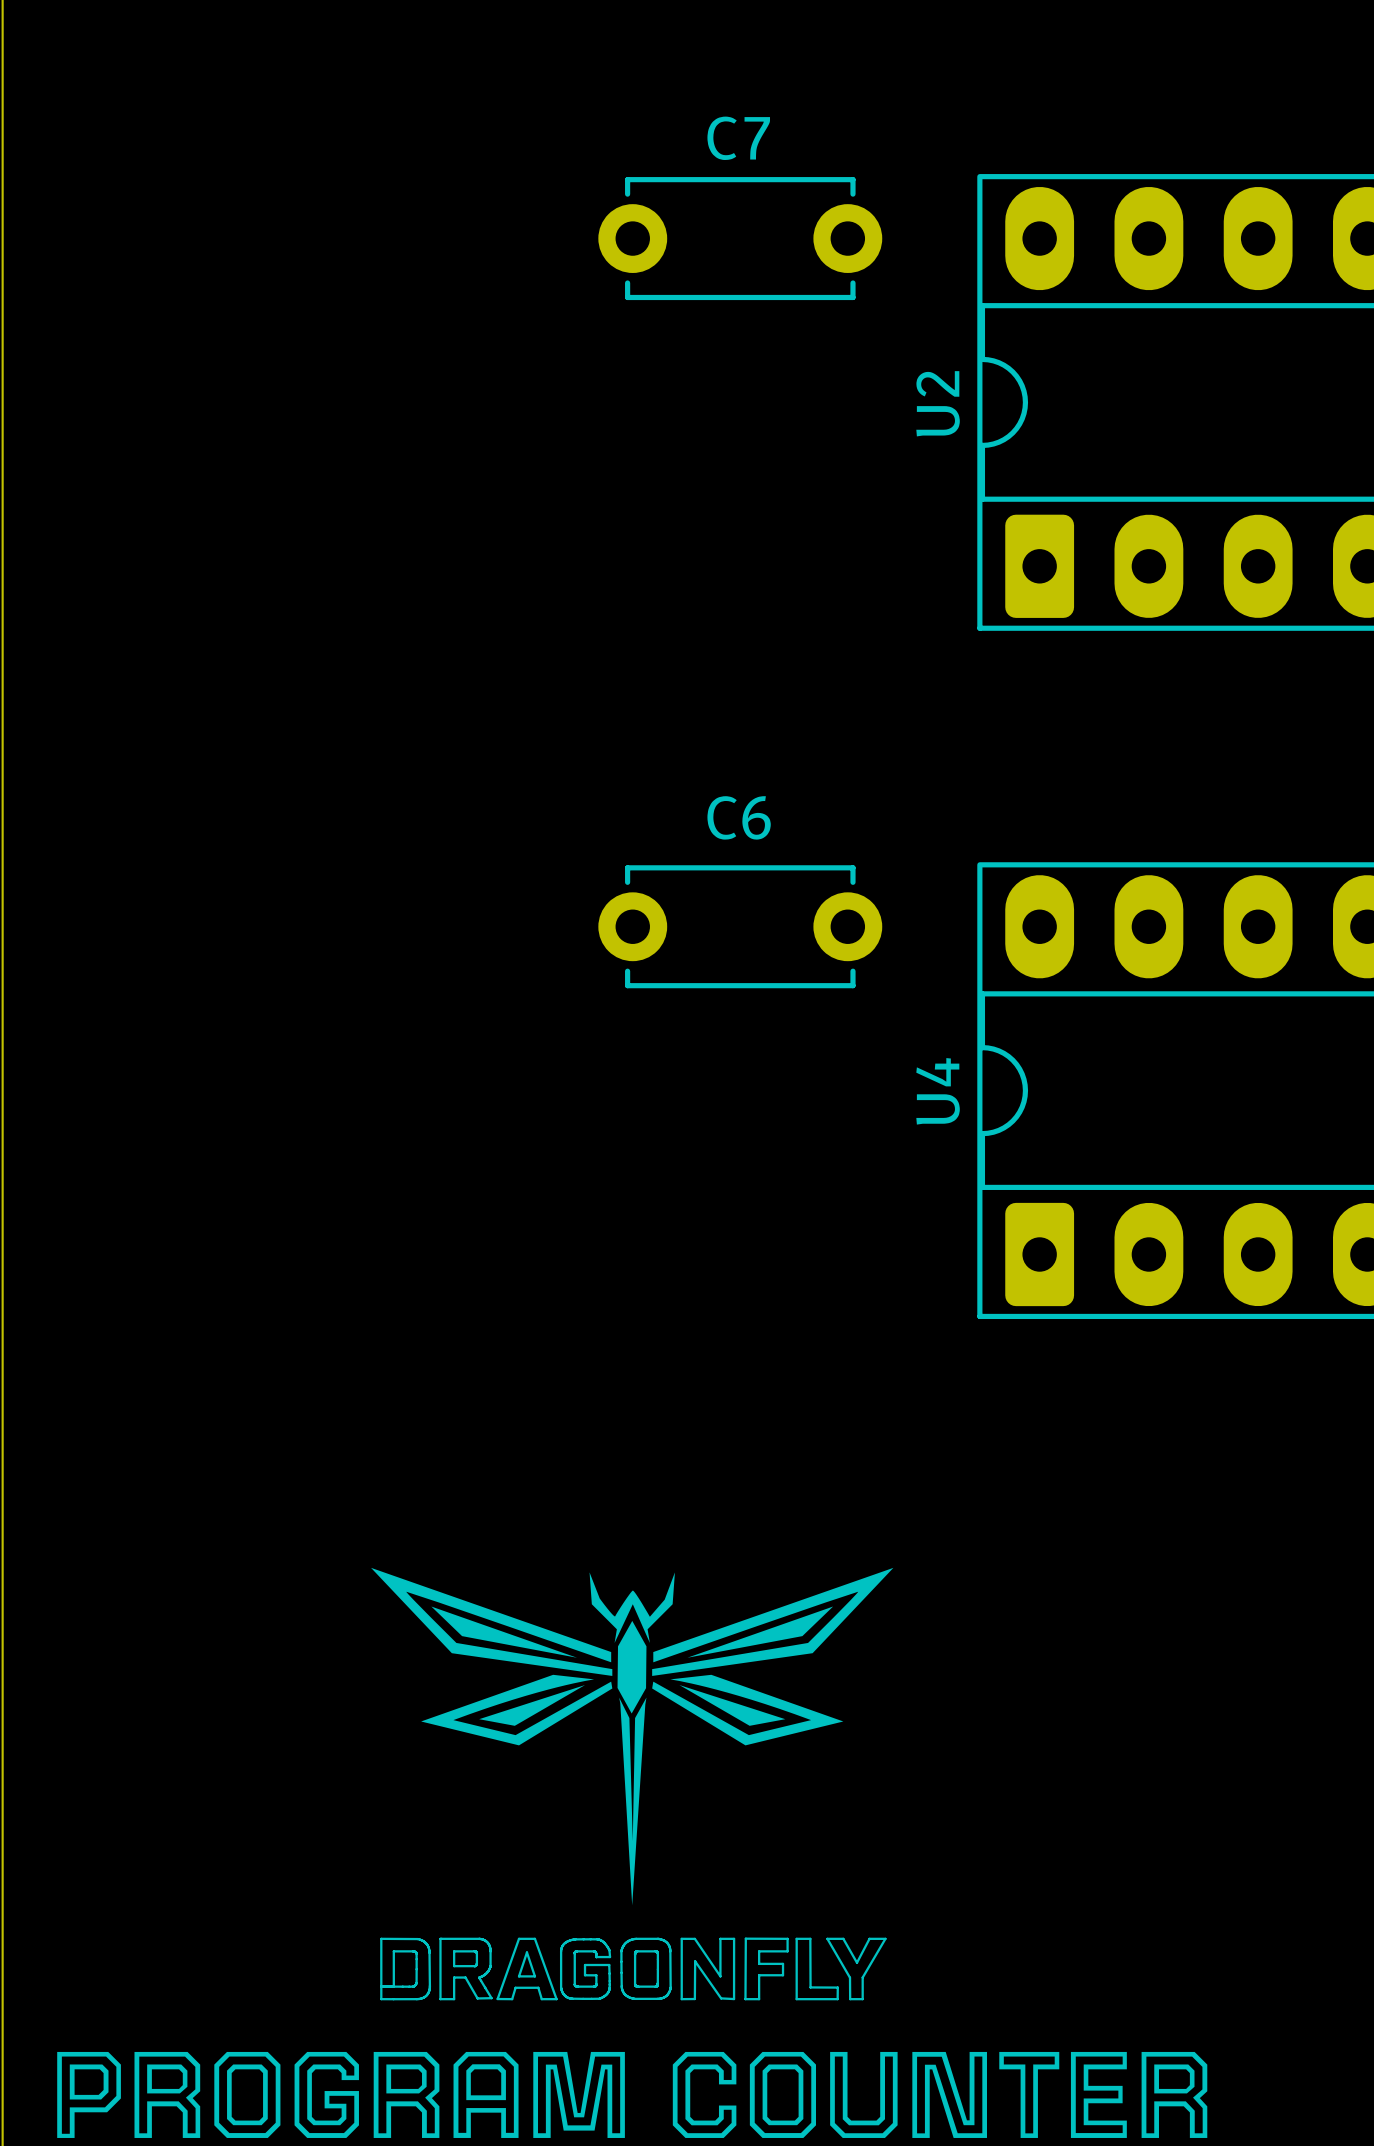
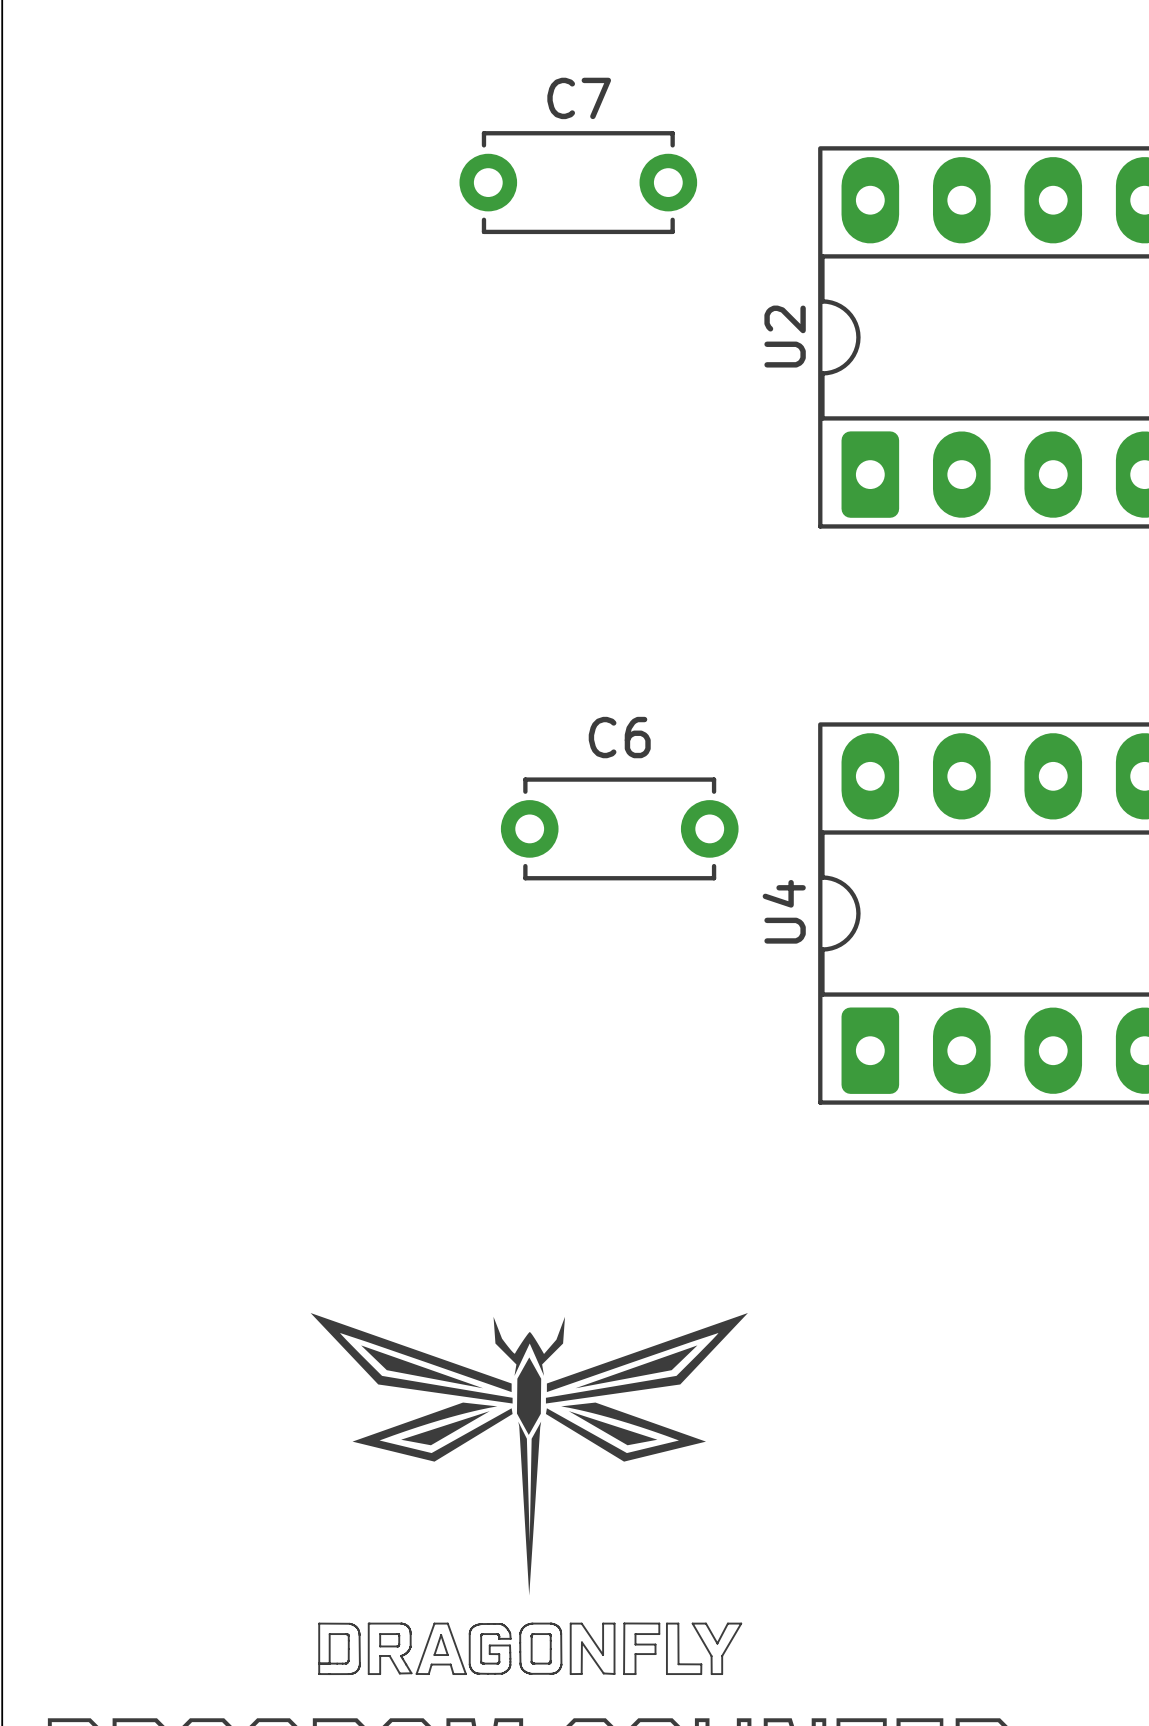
C7 position: (740, 238) -> (578, 182)
C6 position: (740, 926) -> (619, 828)

